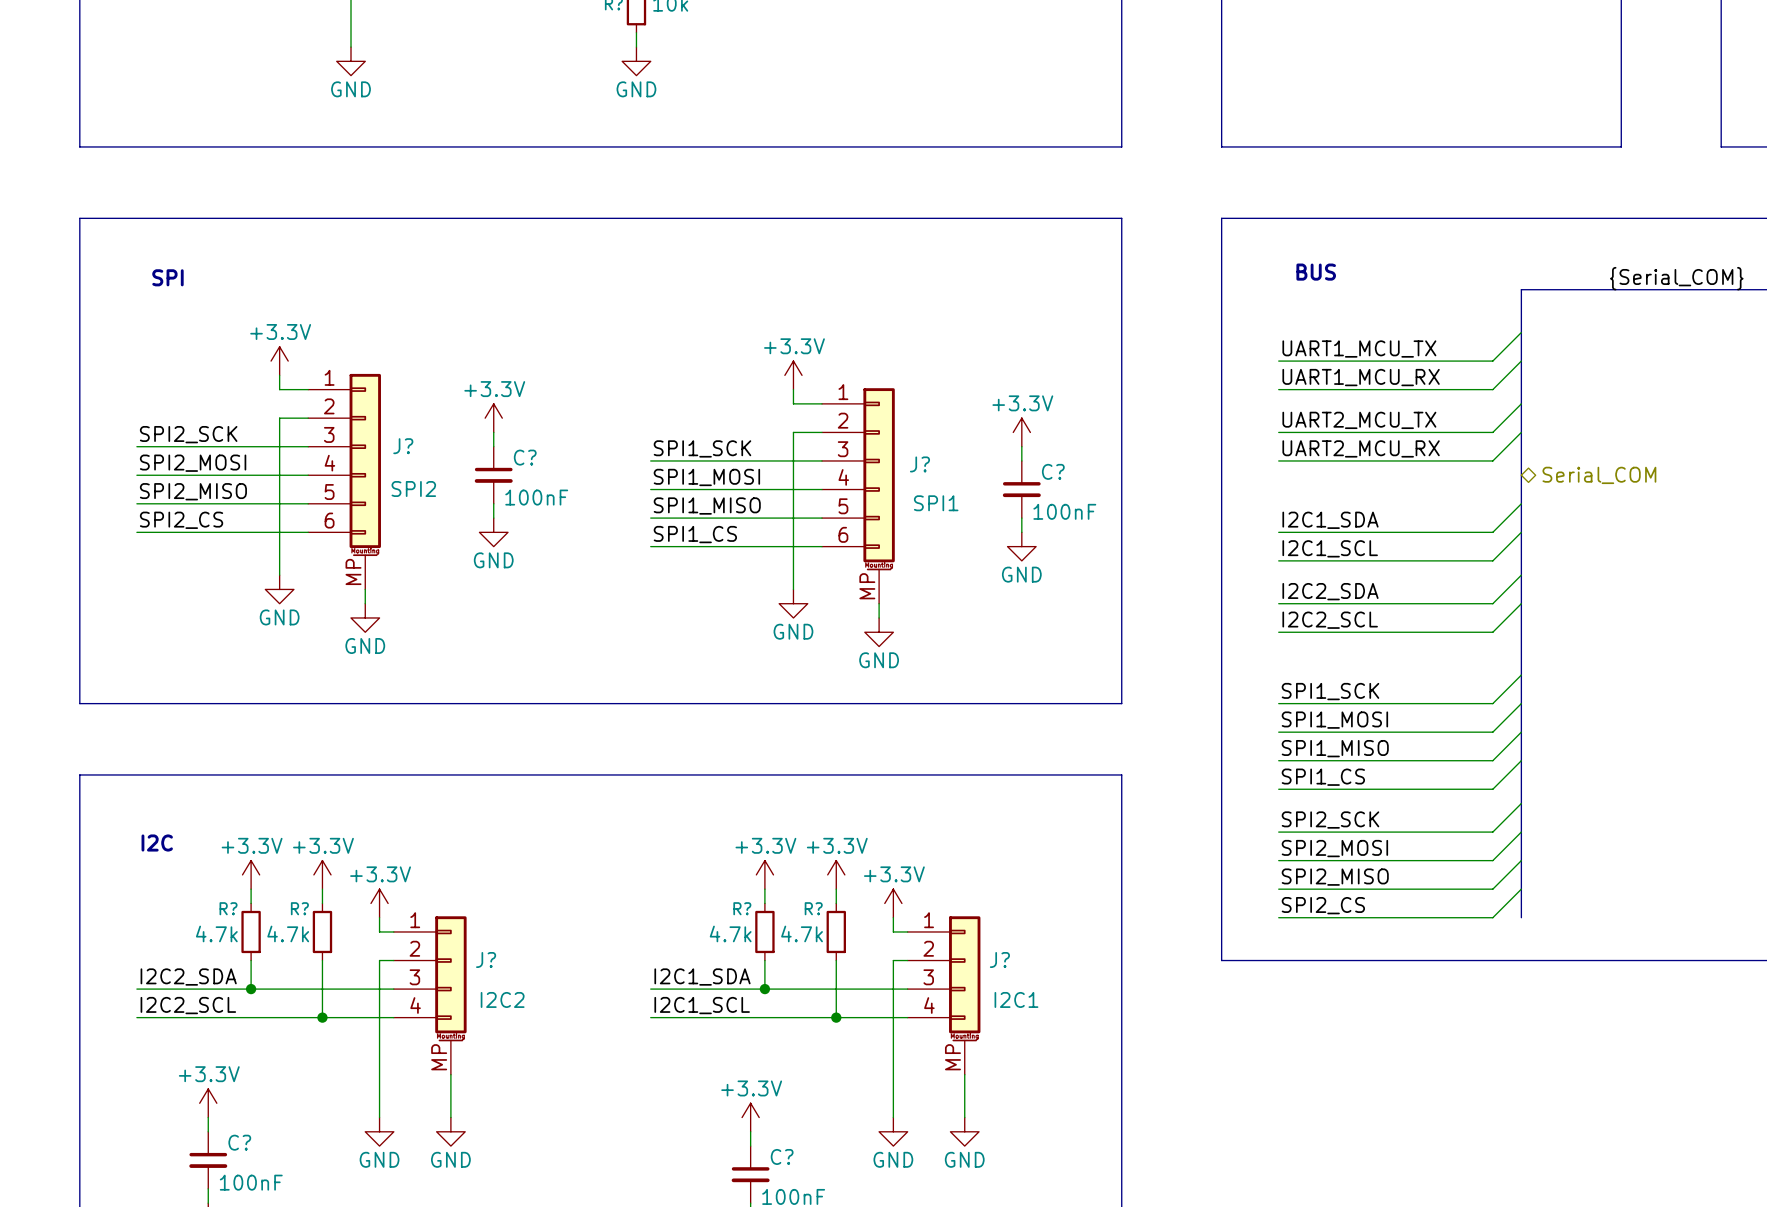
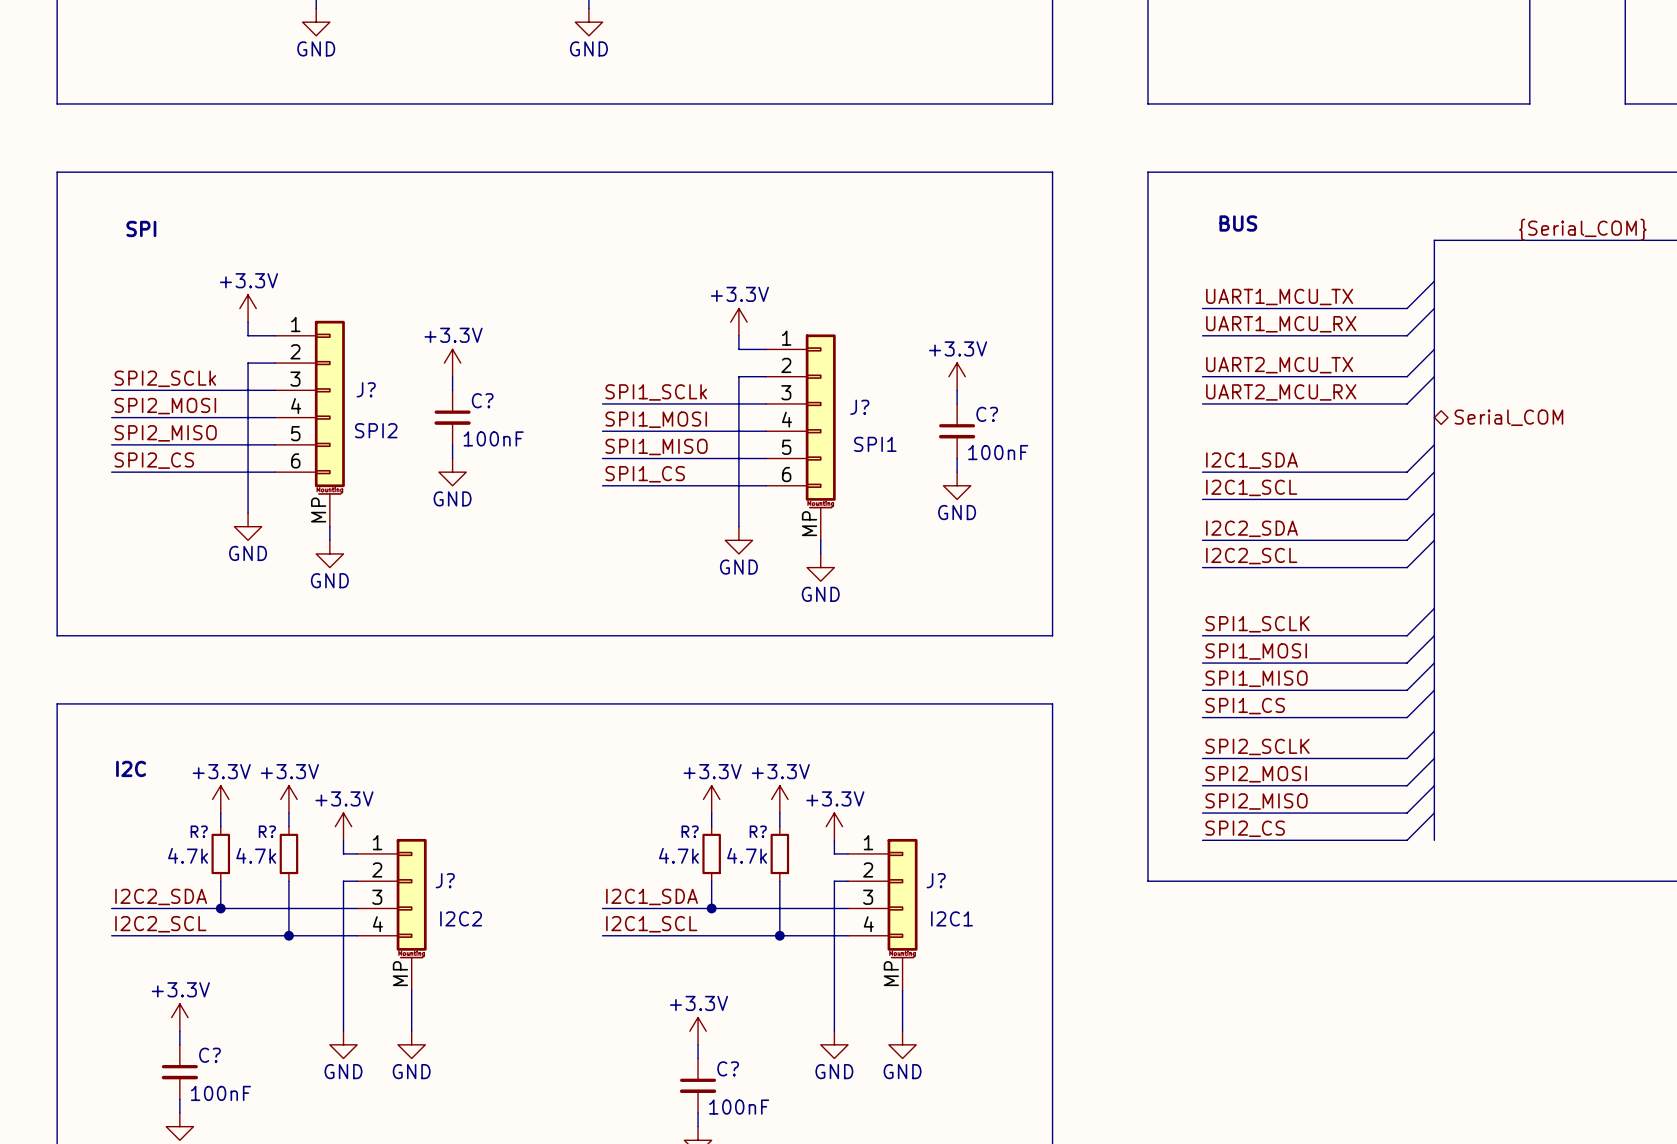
label: SPI2_SCK (188, 434) -> SPI2_SCLk (165, 378)
label: SPI1_SCK (702, 448) -> SPI1_SCLk (656, 392)
label: SPI1_SCK (1330, 691) -> SPI1_SCLK (1257, 624)
label: SPI2_SCK (1330, 820) -> SPI2_SCLK (1257, 746)

